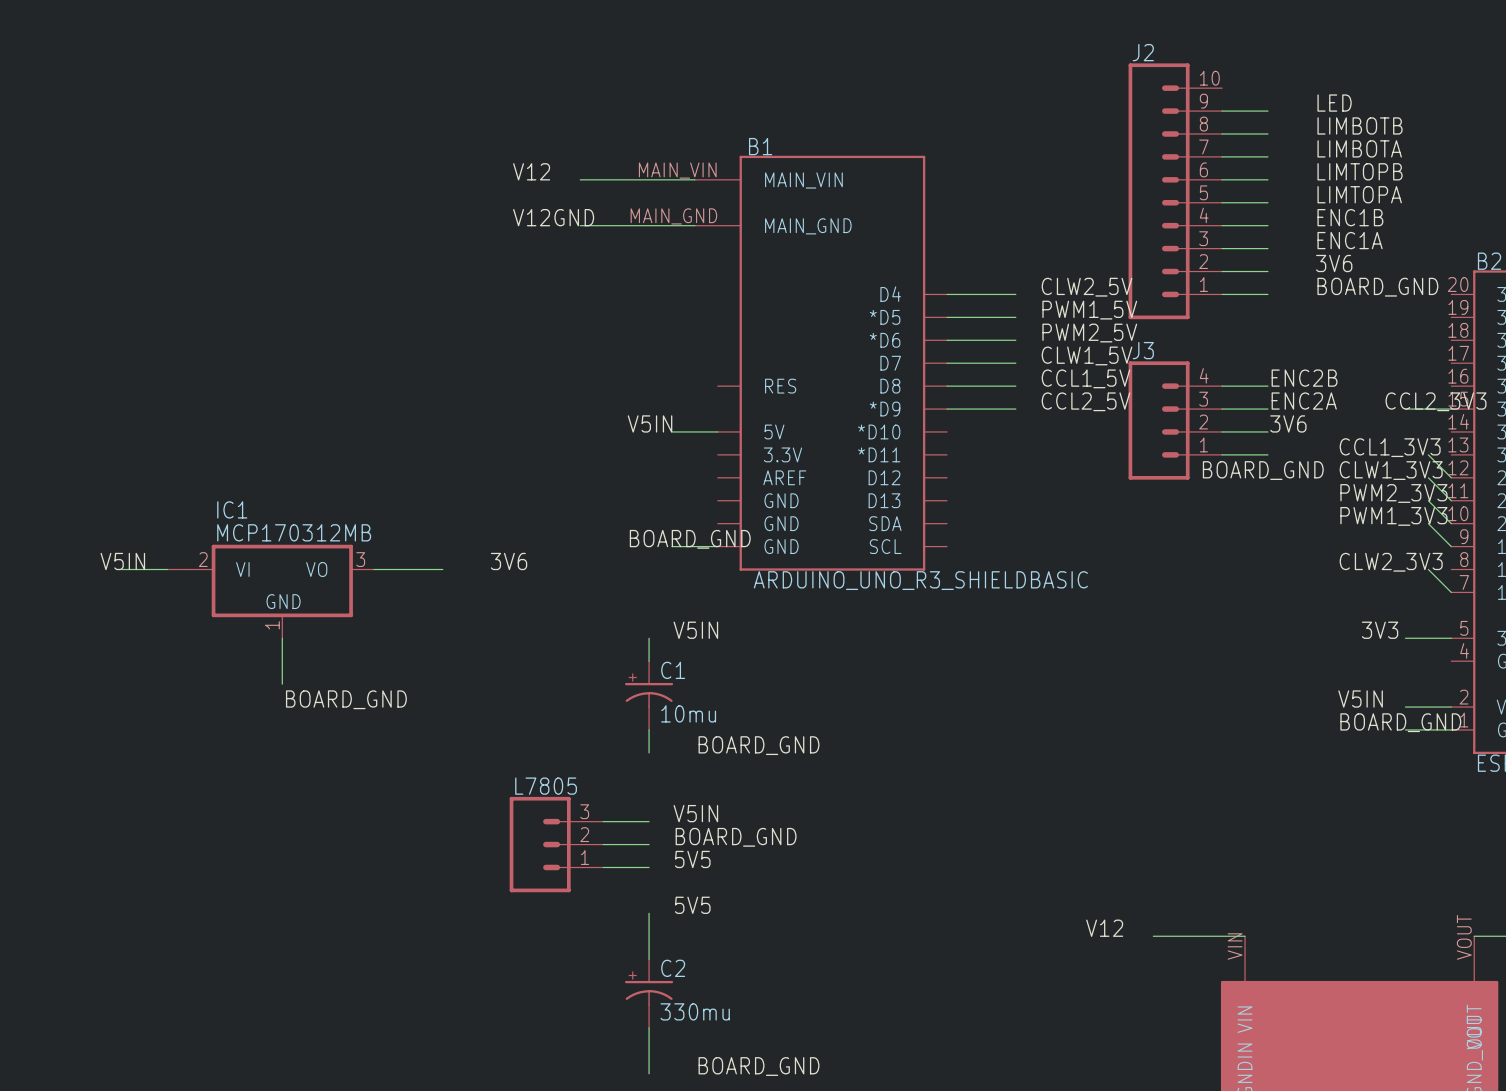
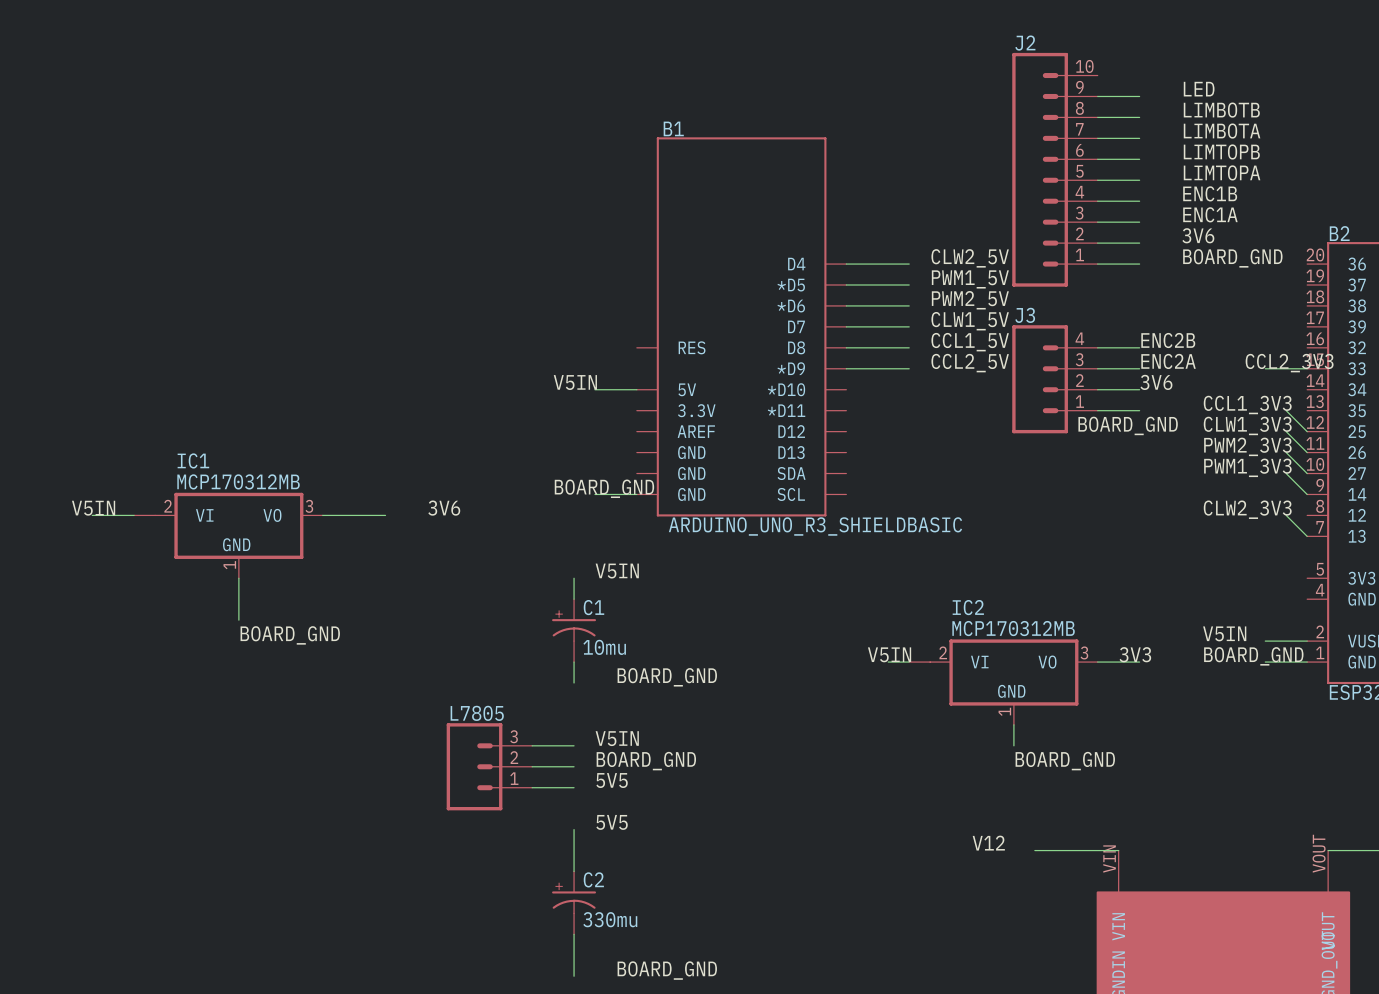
B1 symbol: [694, 155, 948, 571] -> [636, 137, 847, 517]
label: V12 (531, 171) -> none
wire: (580, 179) (694, 179) -> none
label: V12GND (553, 217) -> none
wire: (580, 225) (694, 225) -> none
label position: 3V3 (1380, 630) -> 3V3 (1135, 654)
wire: (1405, 638) (1451, 638) -> (1097, 662) (1139, 662)
label: none -> V5IN (889, 654)
wire: none -> (888, 662) (909, 662)
IC2: none -> MCP170312MB (1003, 682)
wire: none -> (1013, 724) (1013, 745)
label: none -> BOARD_GND (1065, 761)

